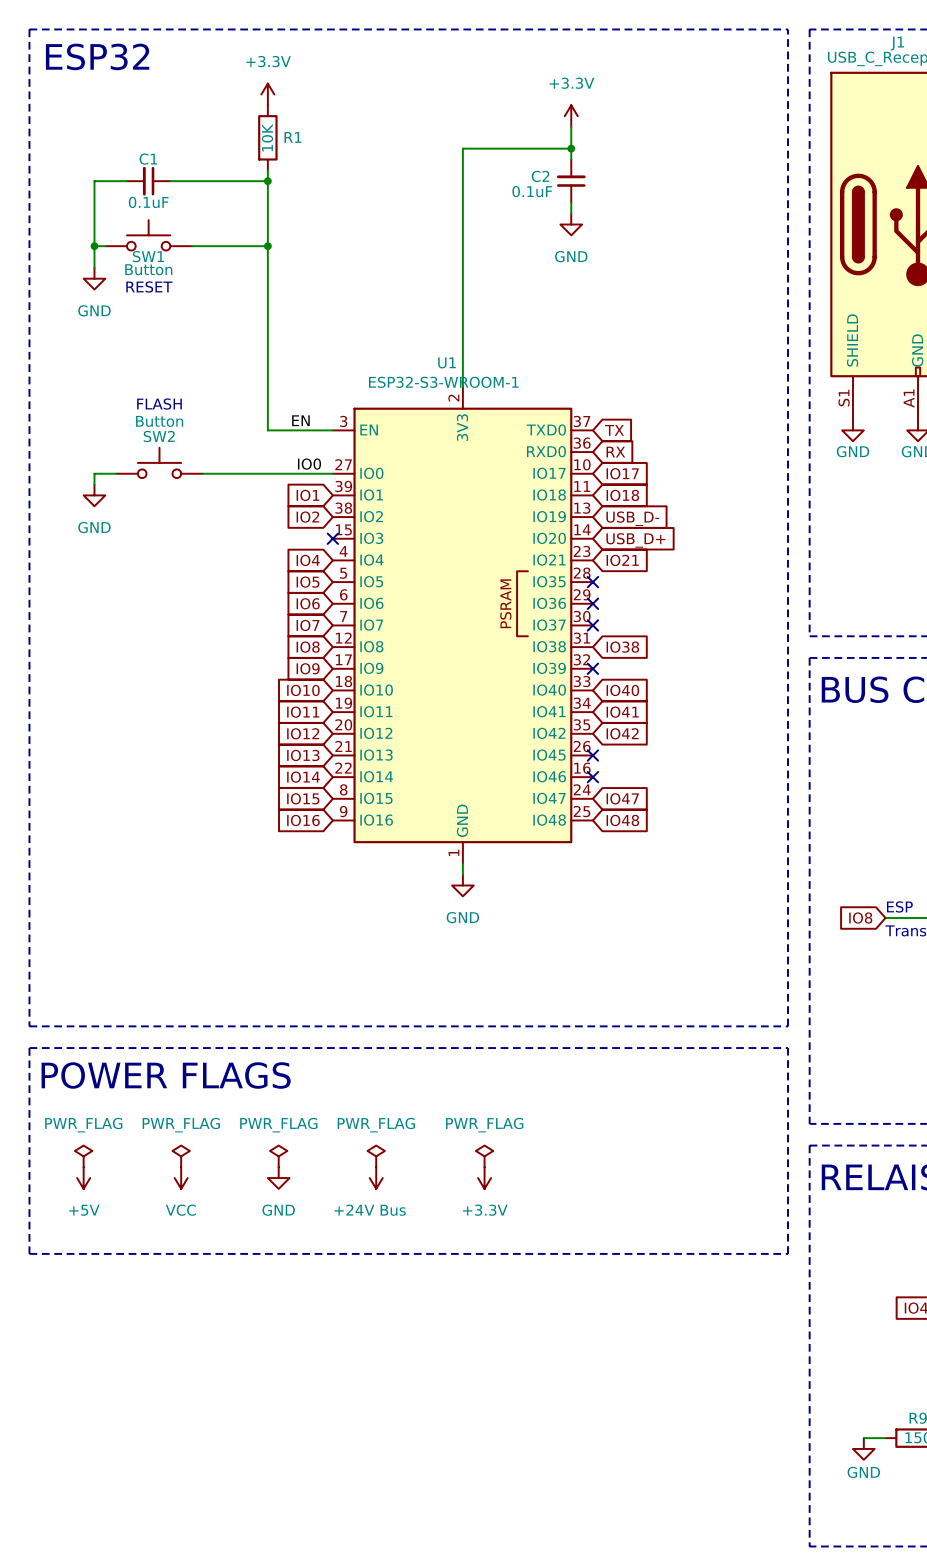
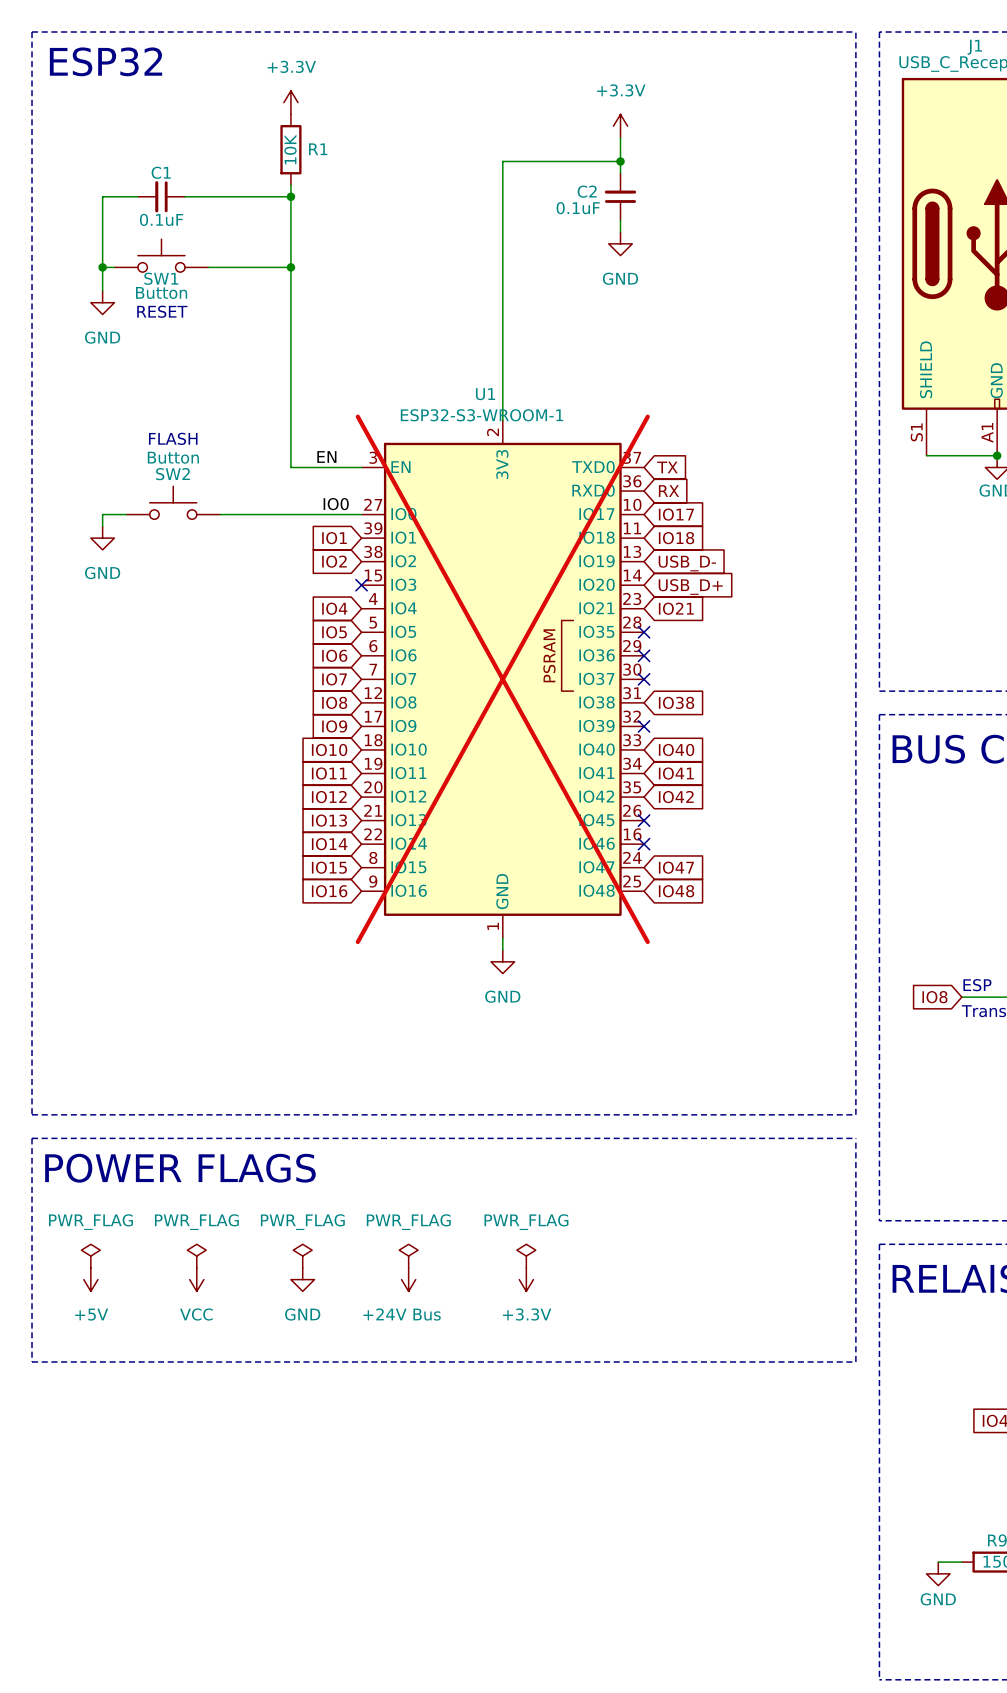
wire: none -> (926, 455) (997, 455)
junction: none -> (997, 455)
power symbol: GND (852, 430) -> none
U1 do-not-place cross: none -> (502, 679)

